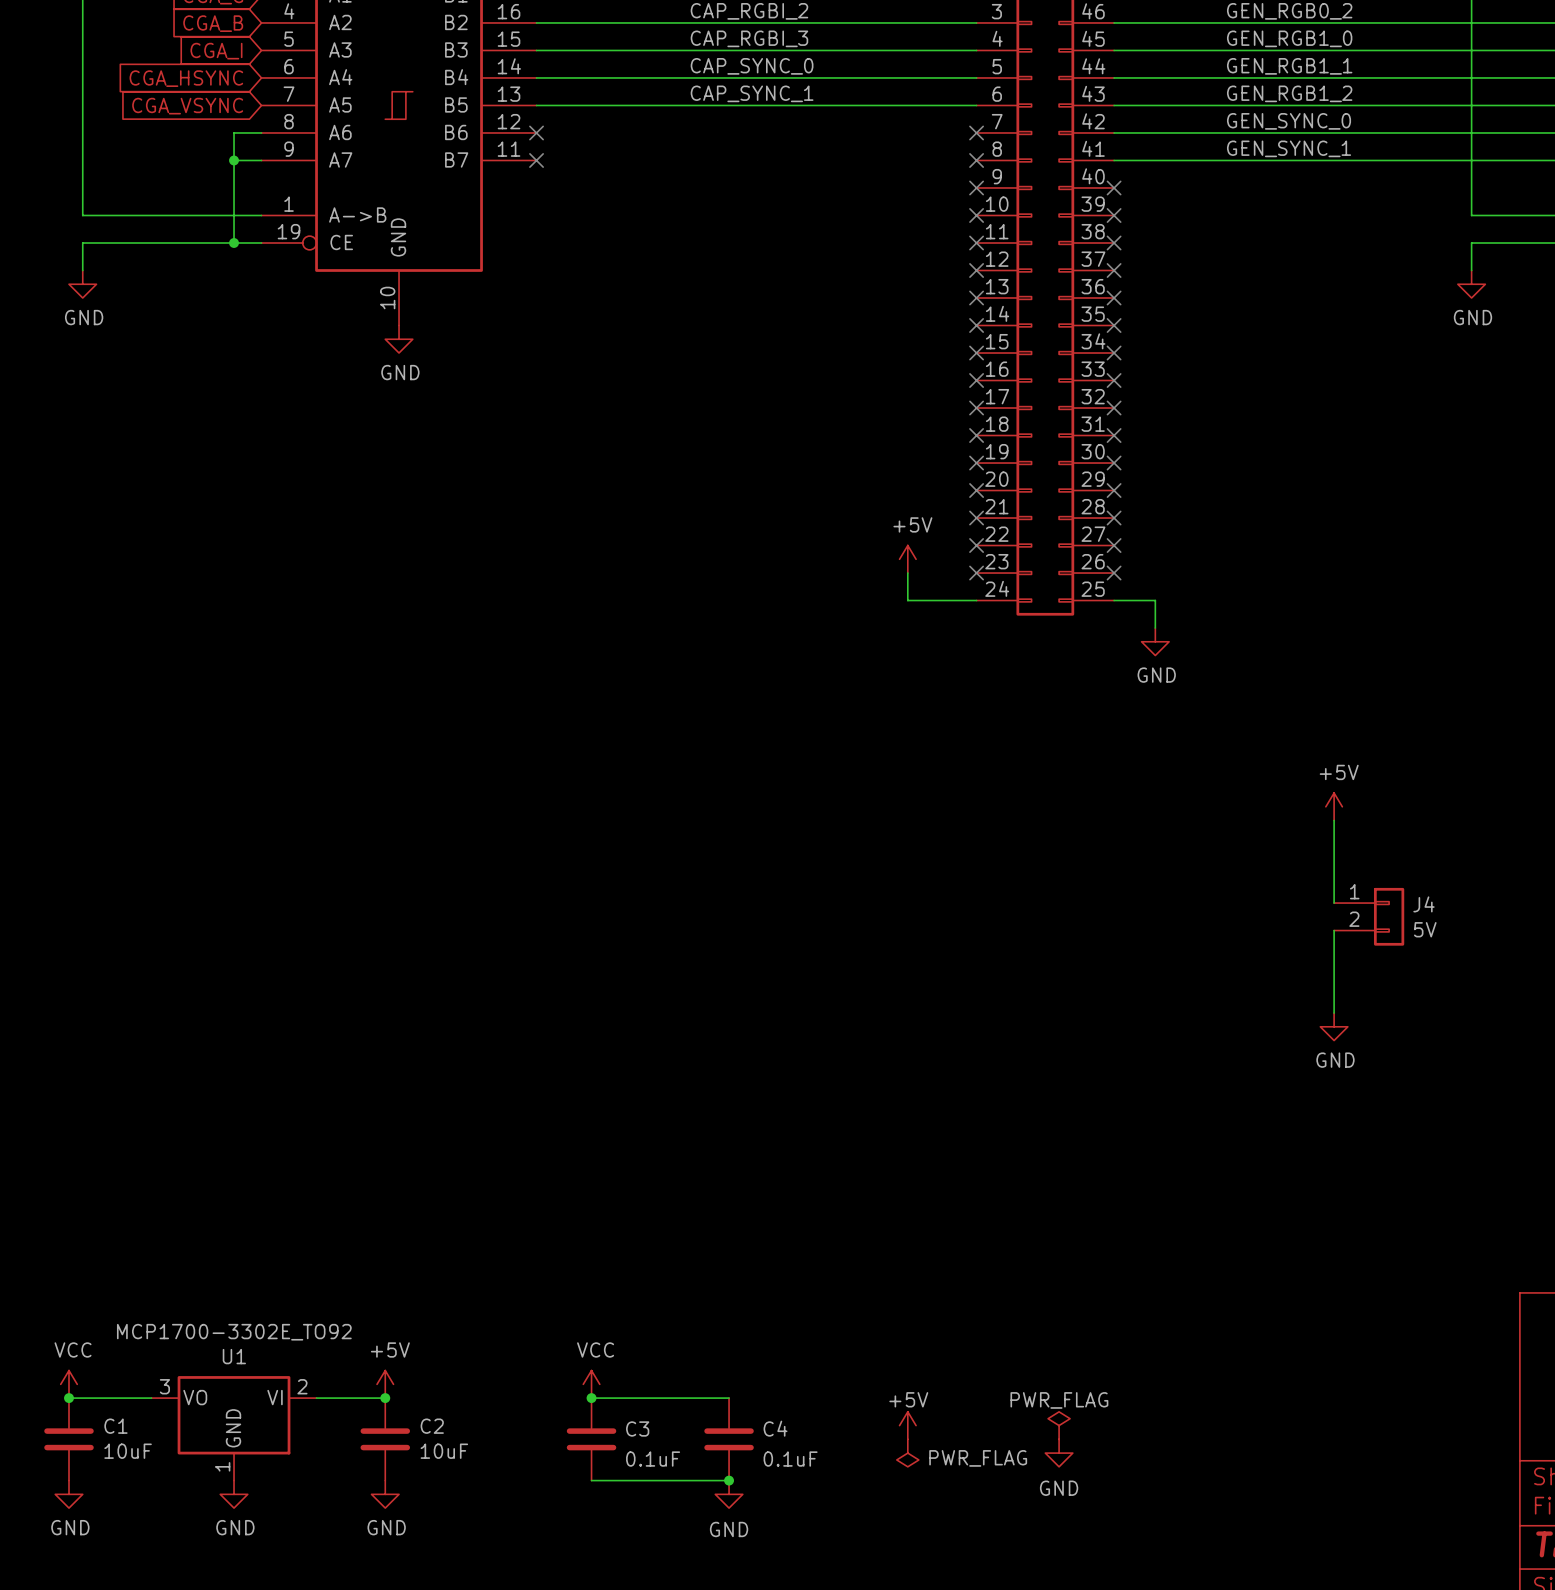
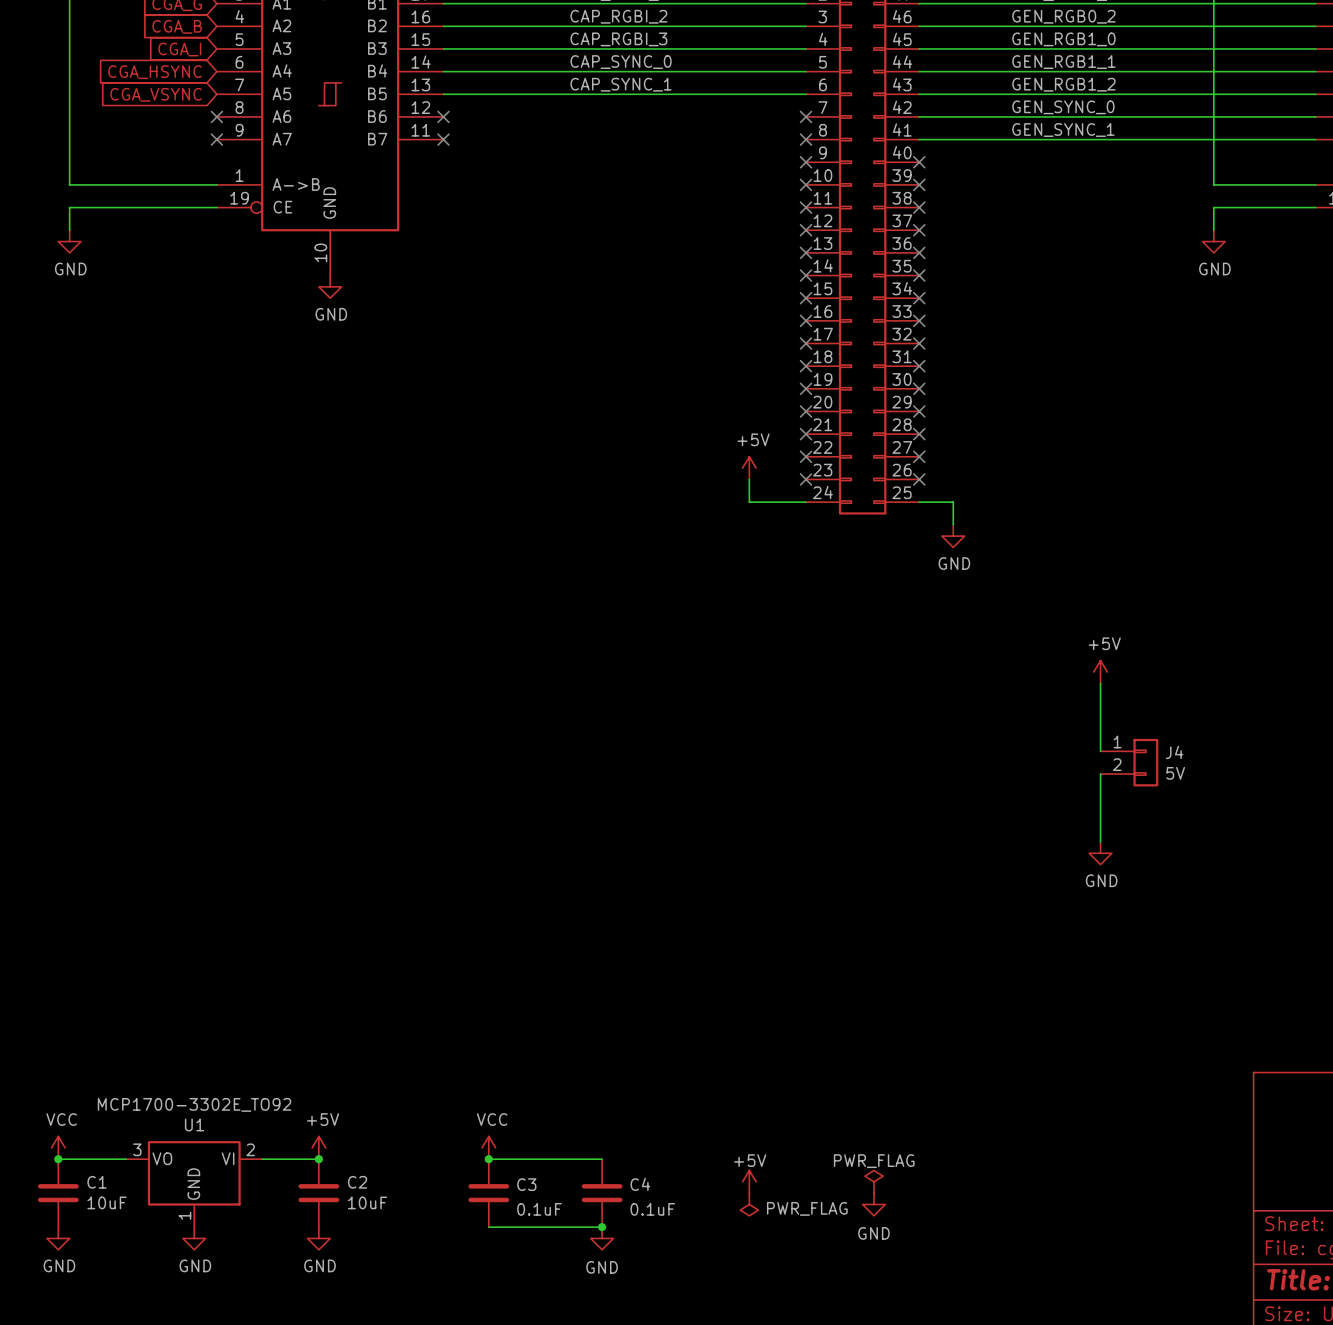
wire: (261, 132) (234, 132) (234, 242) -> none
no-connect mark: none -> (216, 116)
wire: (234, 160) (261, 160) -> none
junction: (234, 160) -> none
no-connect mark: none -> (216, 139)
junction: (234, 242) -> none

